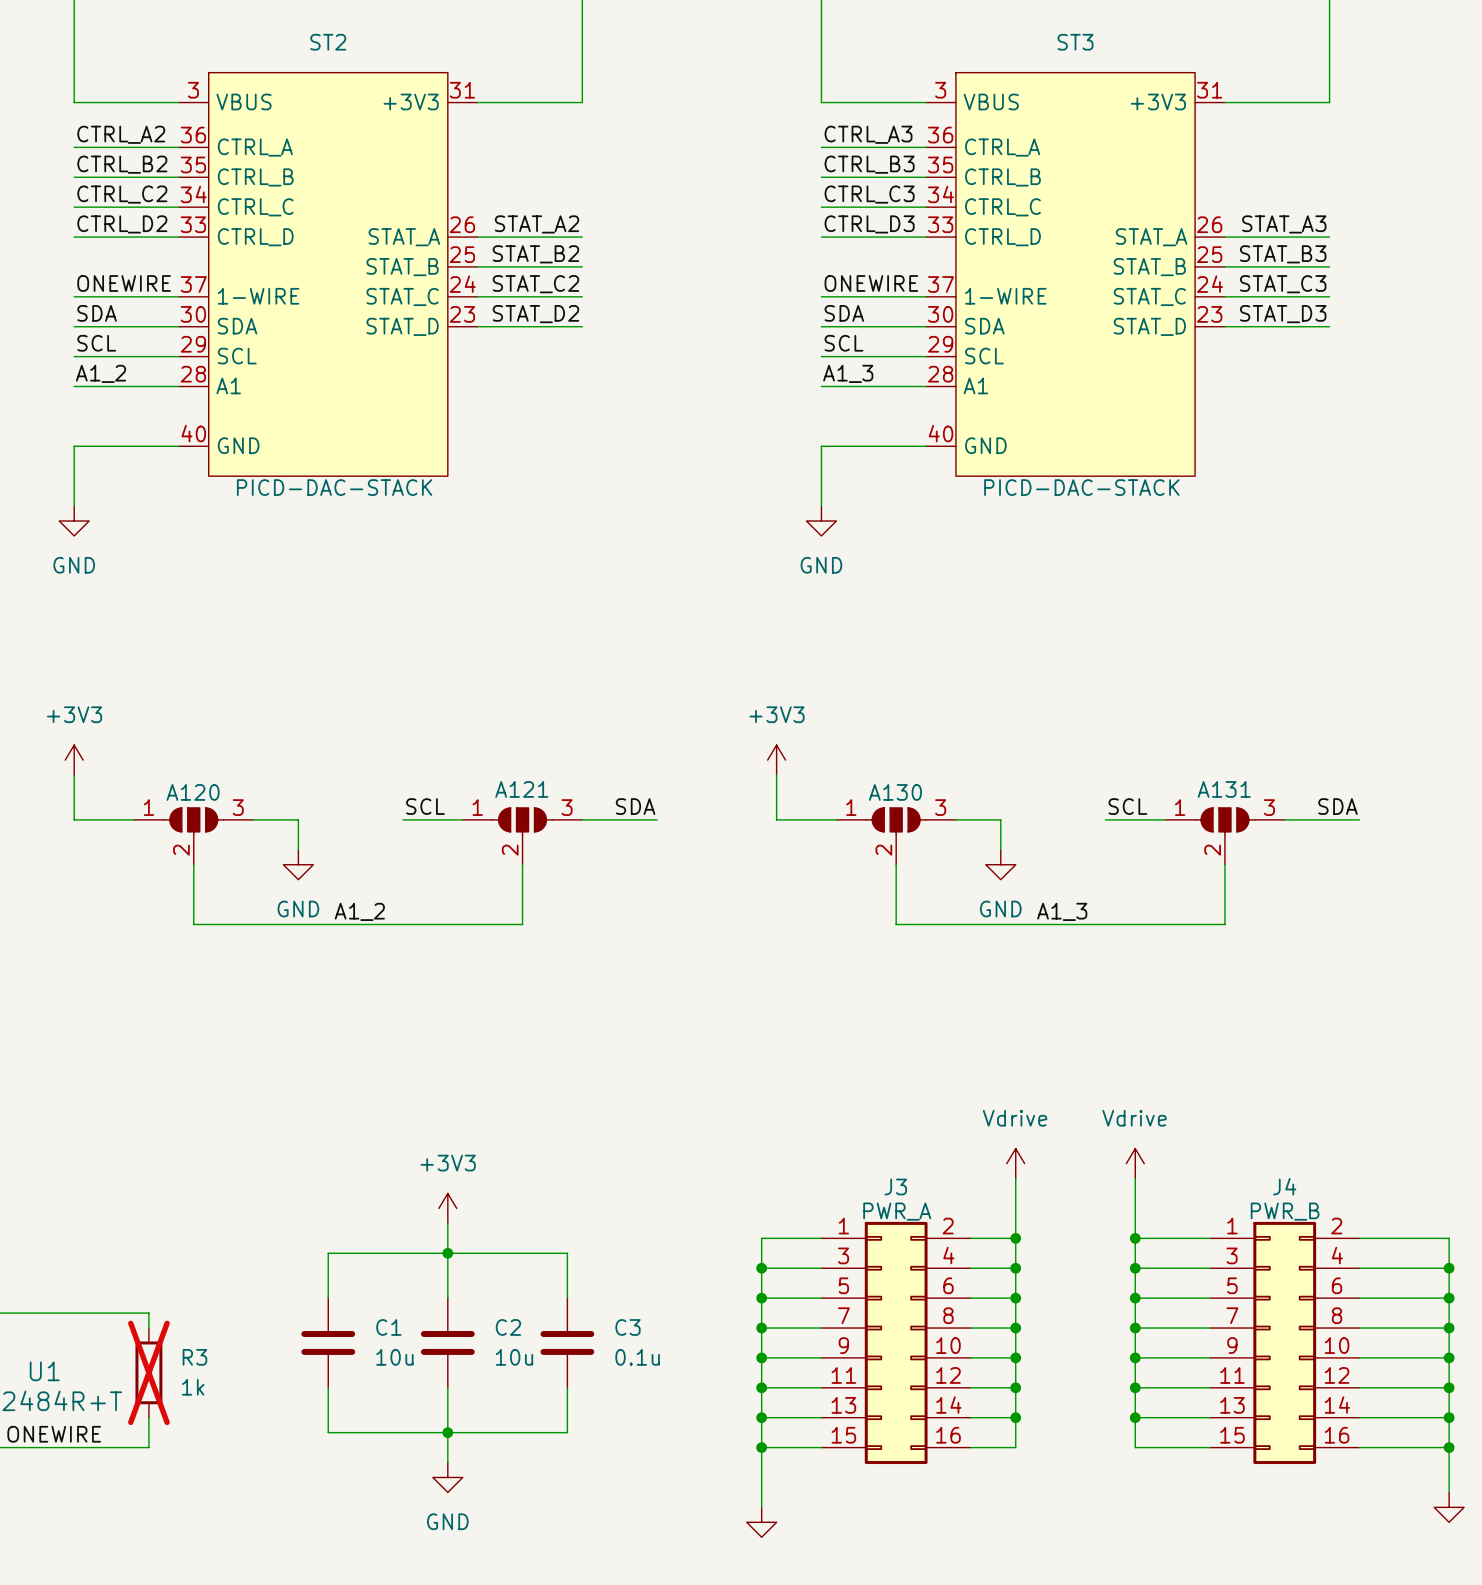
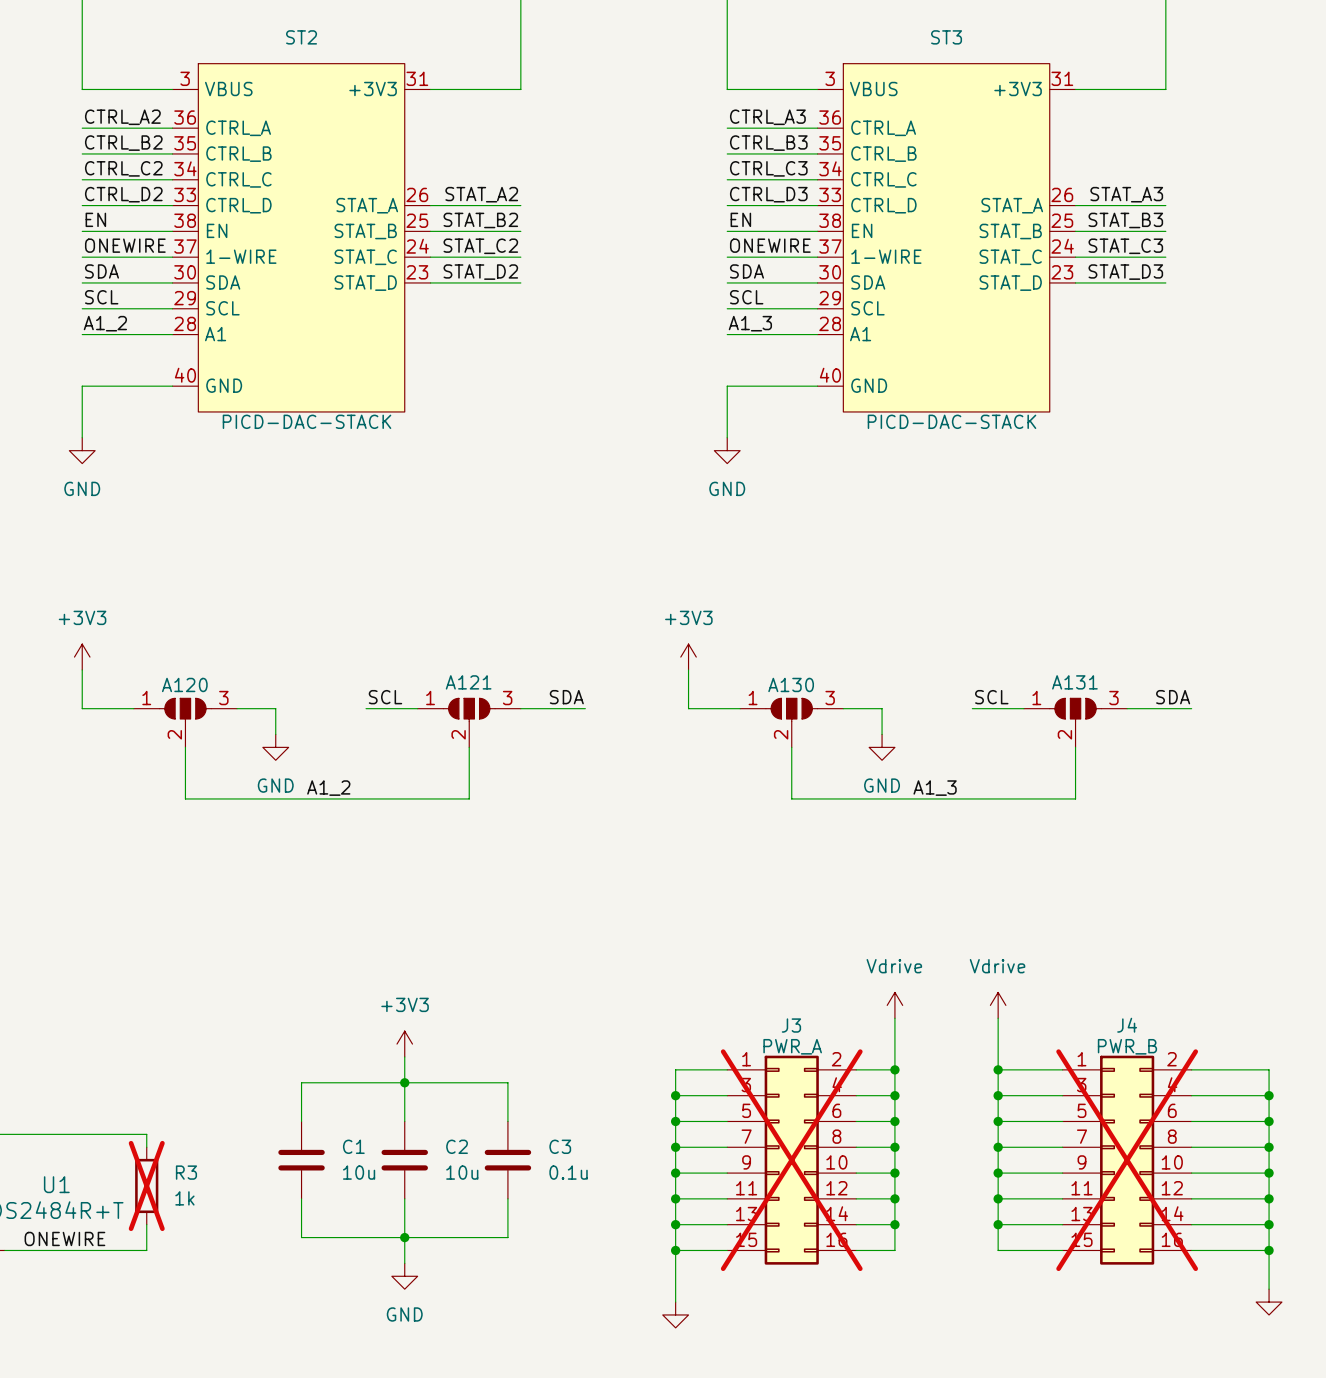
ST2 symbol: [178, 72, 478, 477] -> [172, 63, 431, 412]
ST3 symbol: [926, 72, 1225, 477] -> [817, 63, 1076, 412]
label: none -> EN (95, 219)
label: none -> EN (740, 219)
wire: none -> (82, 231) (172, 231)
wire: none -> (727, 231) (817, 231)
J3 do-not-place cross: none -> (791, 1160)
J4 do-not-place cross: none -> (1127, 1160)

